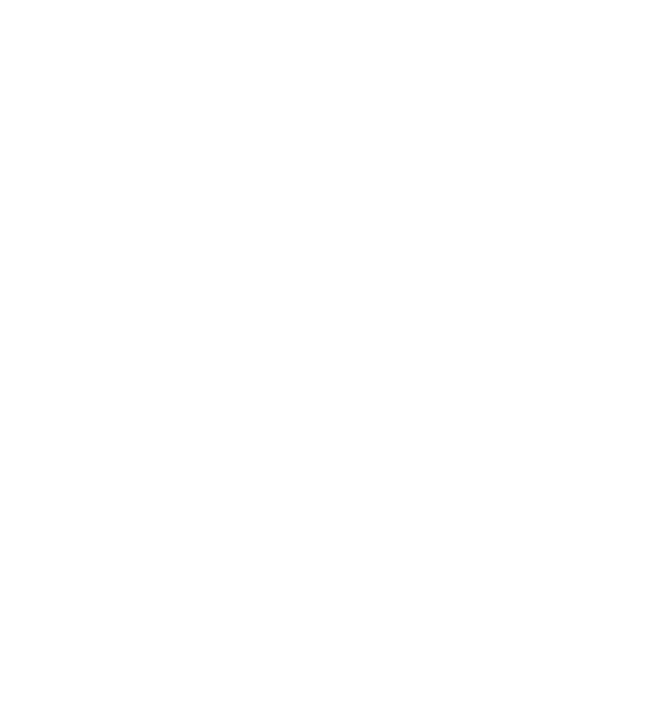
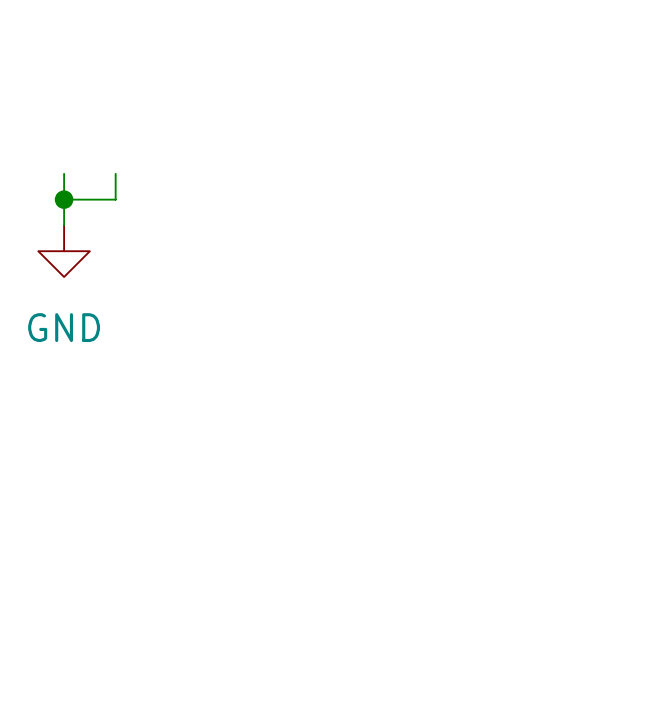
wire: none -> (64, 173) (64, 225)
wire: none -> (115, 173) (115, 199) (64, 199)
junction: none -> (64, 199)
power symbol: none -> GND (64, 251)

